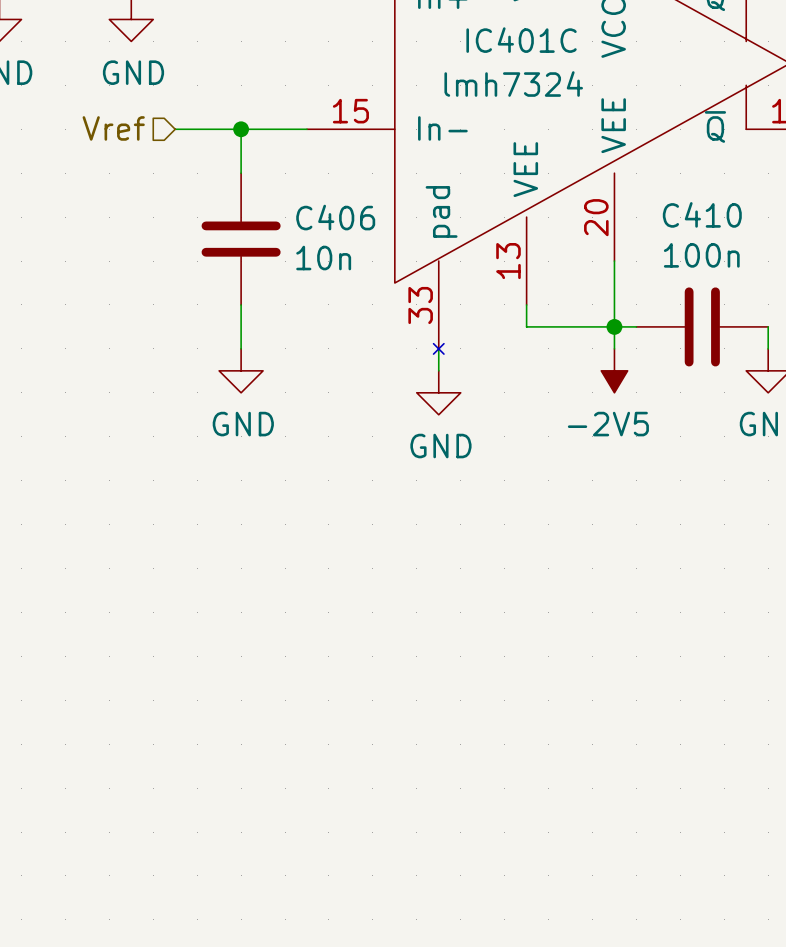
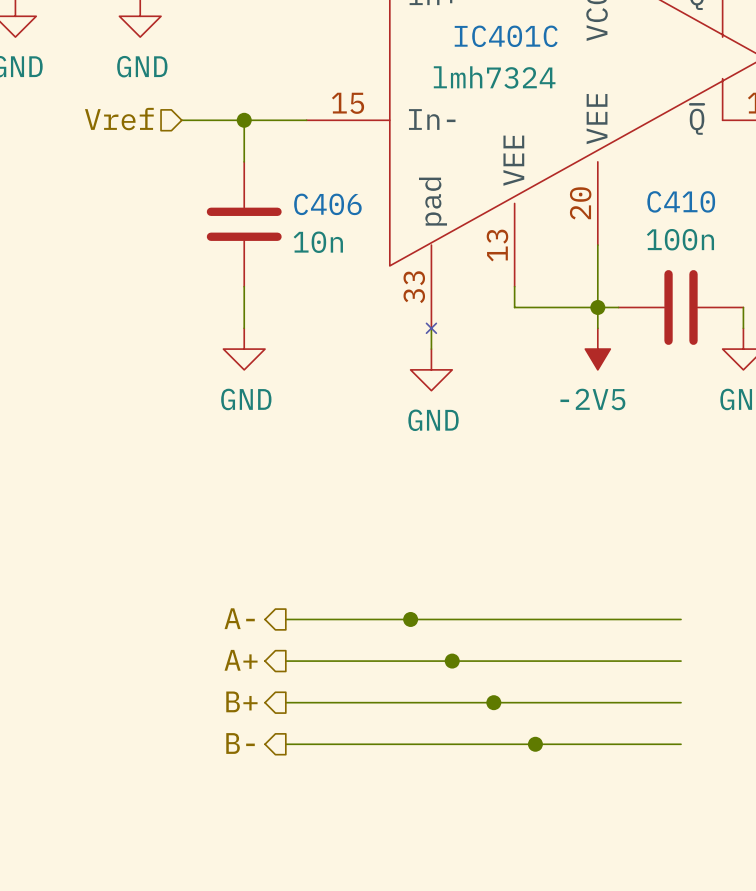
hierarchical label: none -> A- (239, 618)
wire: none -> (285, 619) (681, 619)
junction: none -> (410, 619)
hierarchical label: none -> A+ (241, 660)
wire: none -> (285, 661) (681, 661)
junction: none -> (452, 661)
hierarchical label: none -> B+ (241, 701)
wire: none -> (285, 702) (681, 702)
junction: none -> (493, 702)
hierarchical label: none -> B- (240, 743)
wire: none -> (285, 744) (681, 744)
junction: none -> (535, 744)

